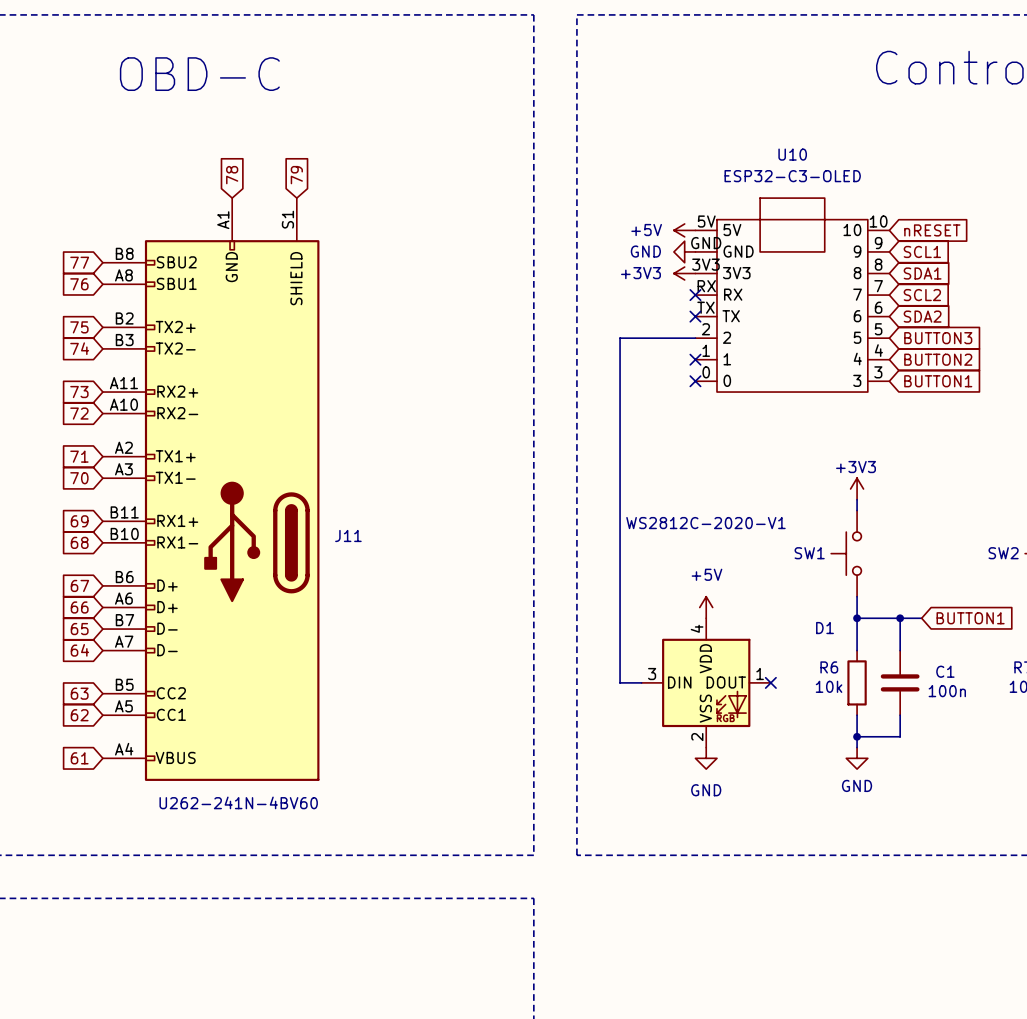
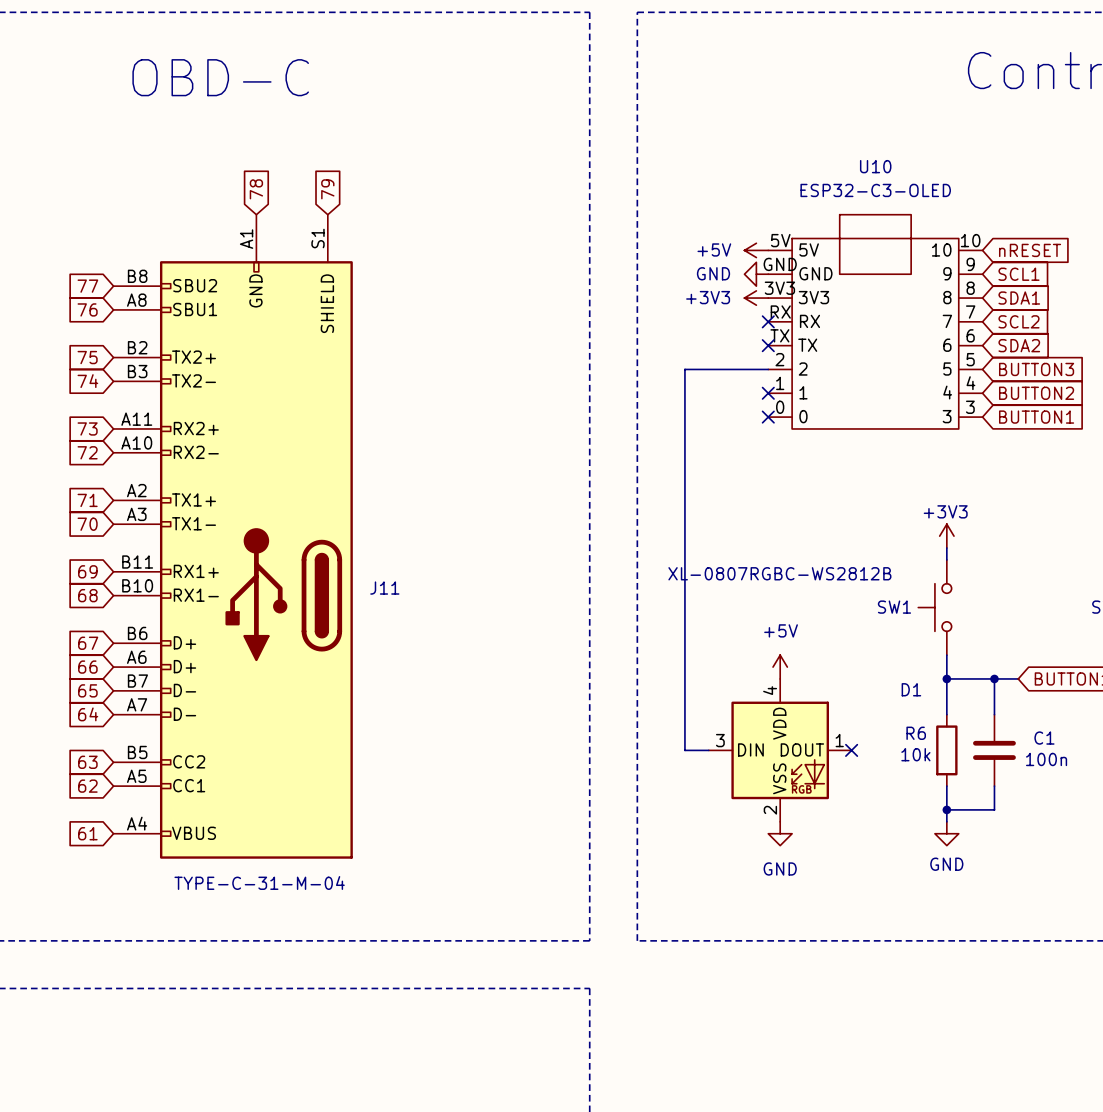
D1 value: WS2812C-2020-V1 (705, 523) -> XL-0807RGBC-WS2812B (779, 573)
J11 value: U262-241N-4BV60 (238, 802) -> TYPE-C-31-M-04 (259, 883)

